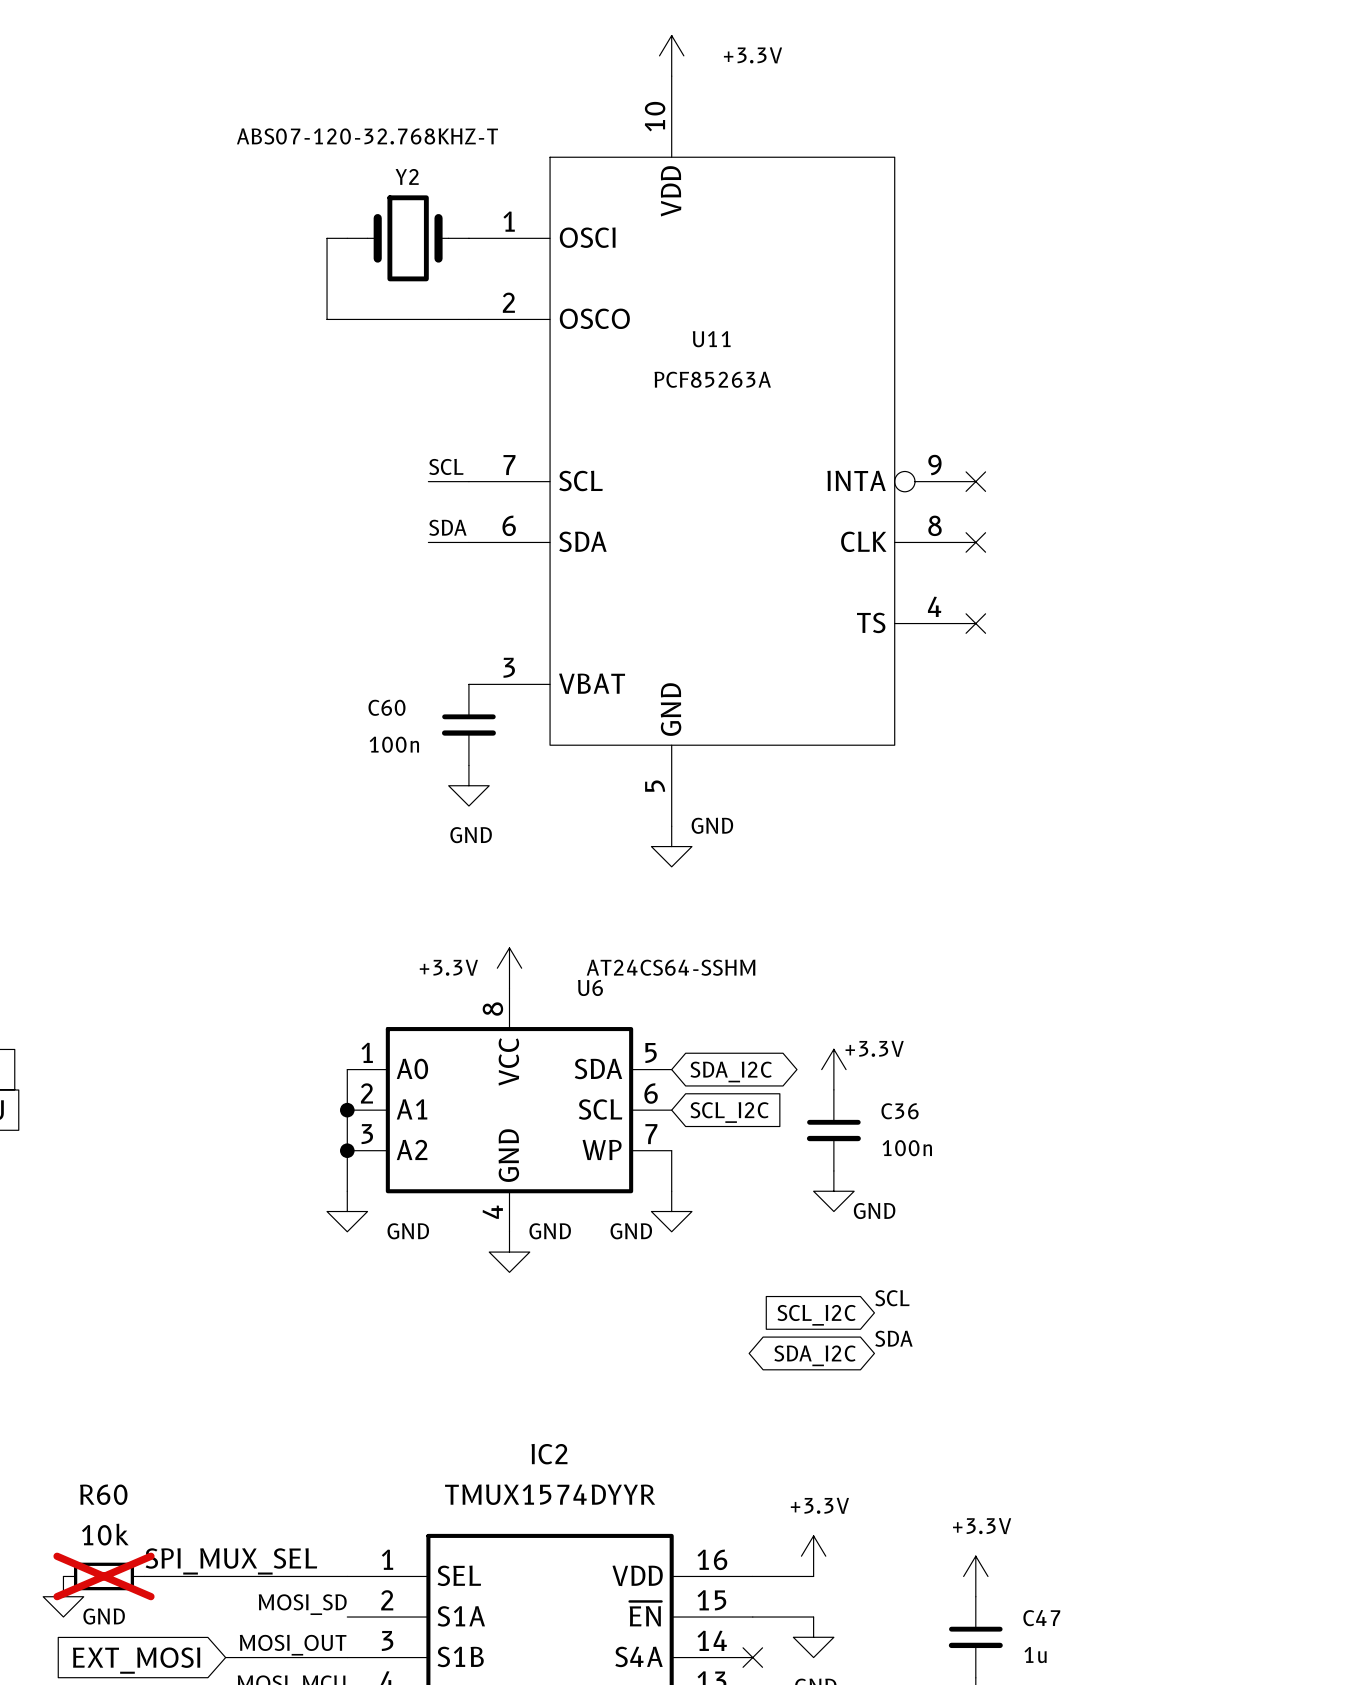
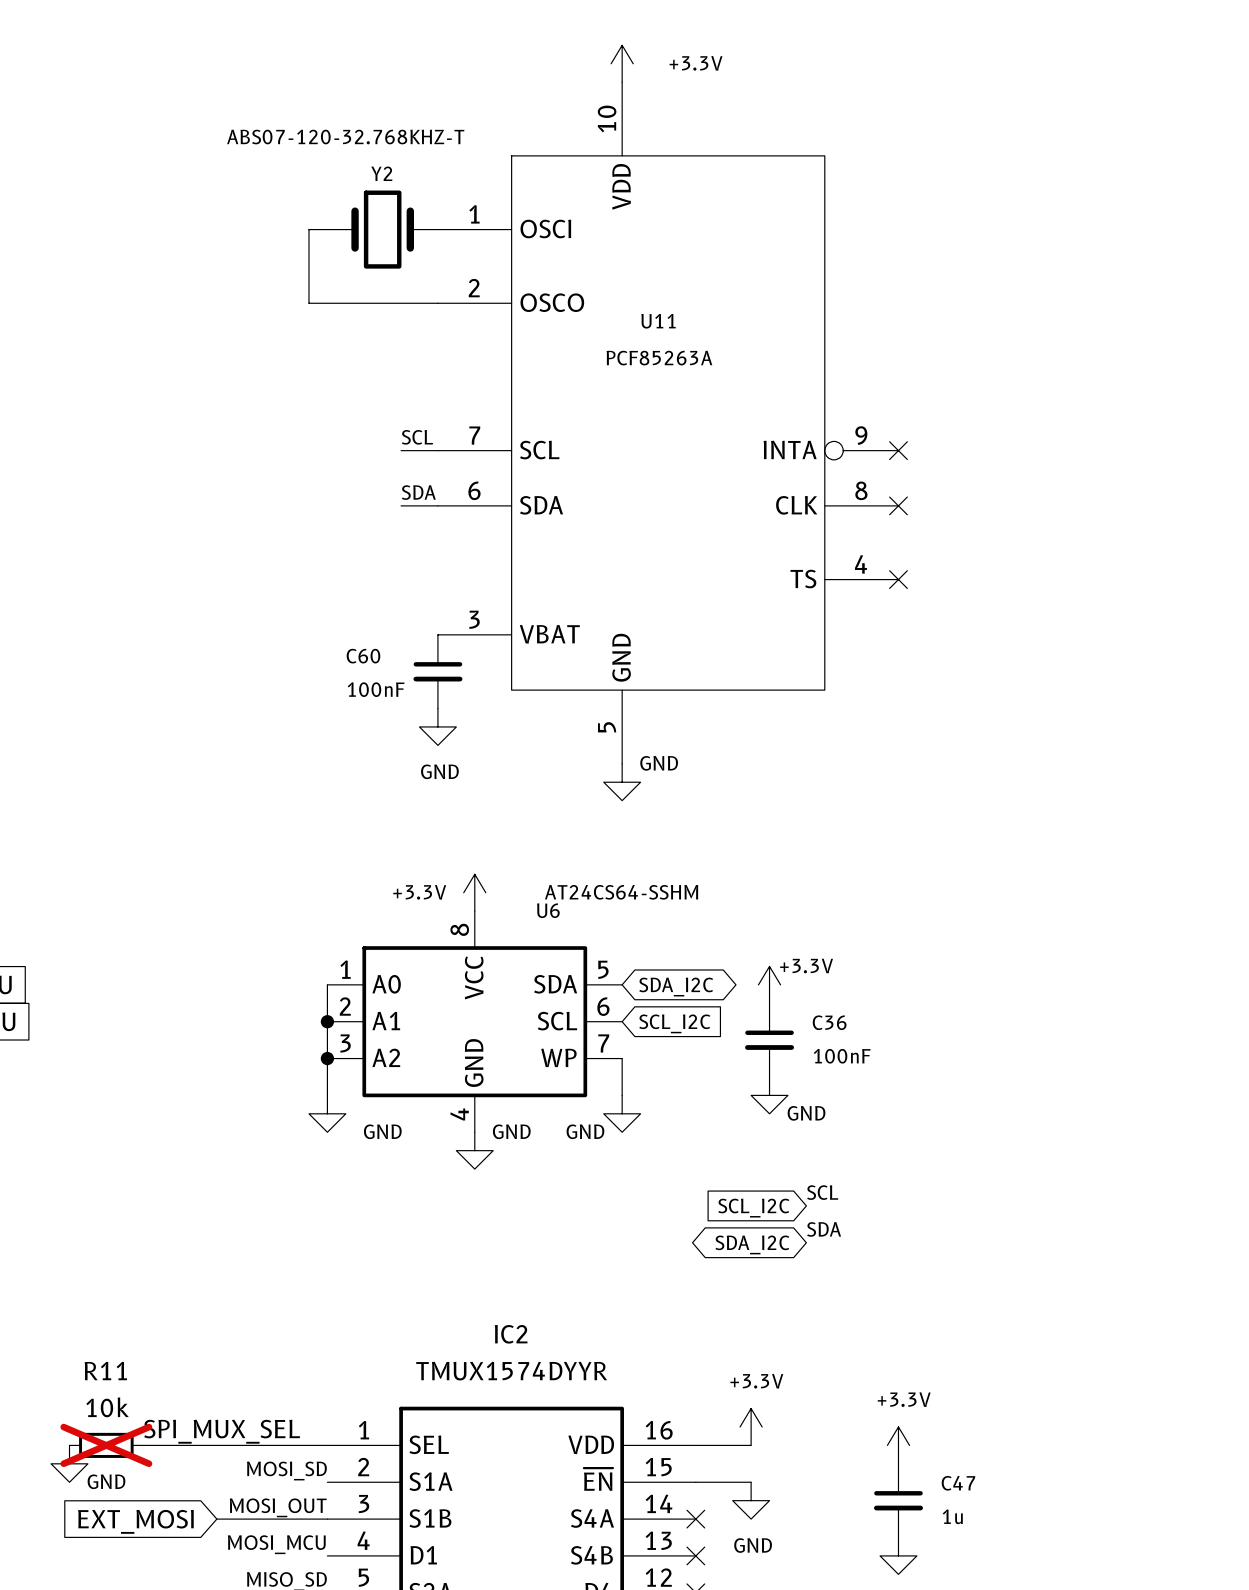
C60 value: 100n (394, 744) -> 100nF (376, 689)
C36 value: 100n (907, 1148) -> 100nF (842, 1056)
R60 name: R60 (103, 1494) -> R11 (105, 1371)

